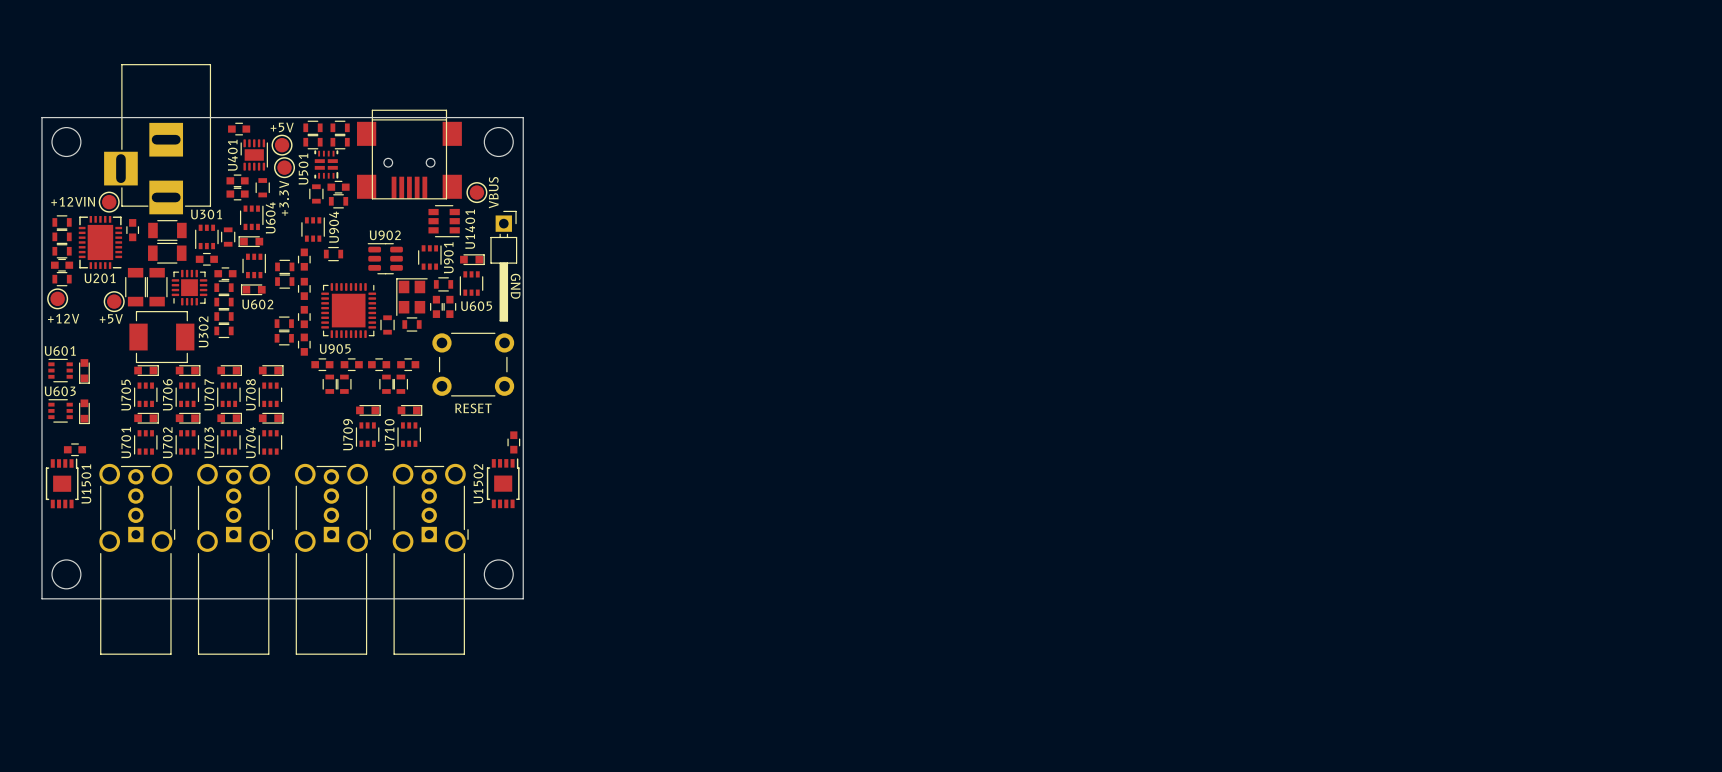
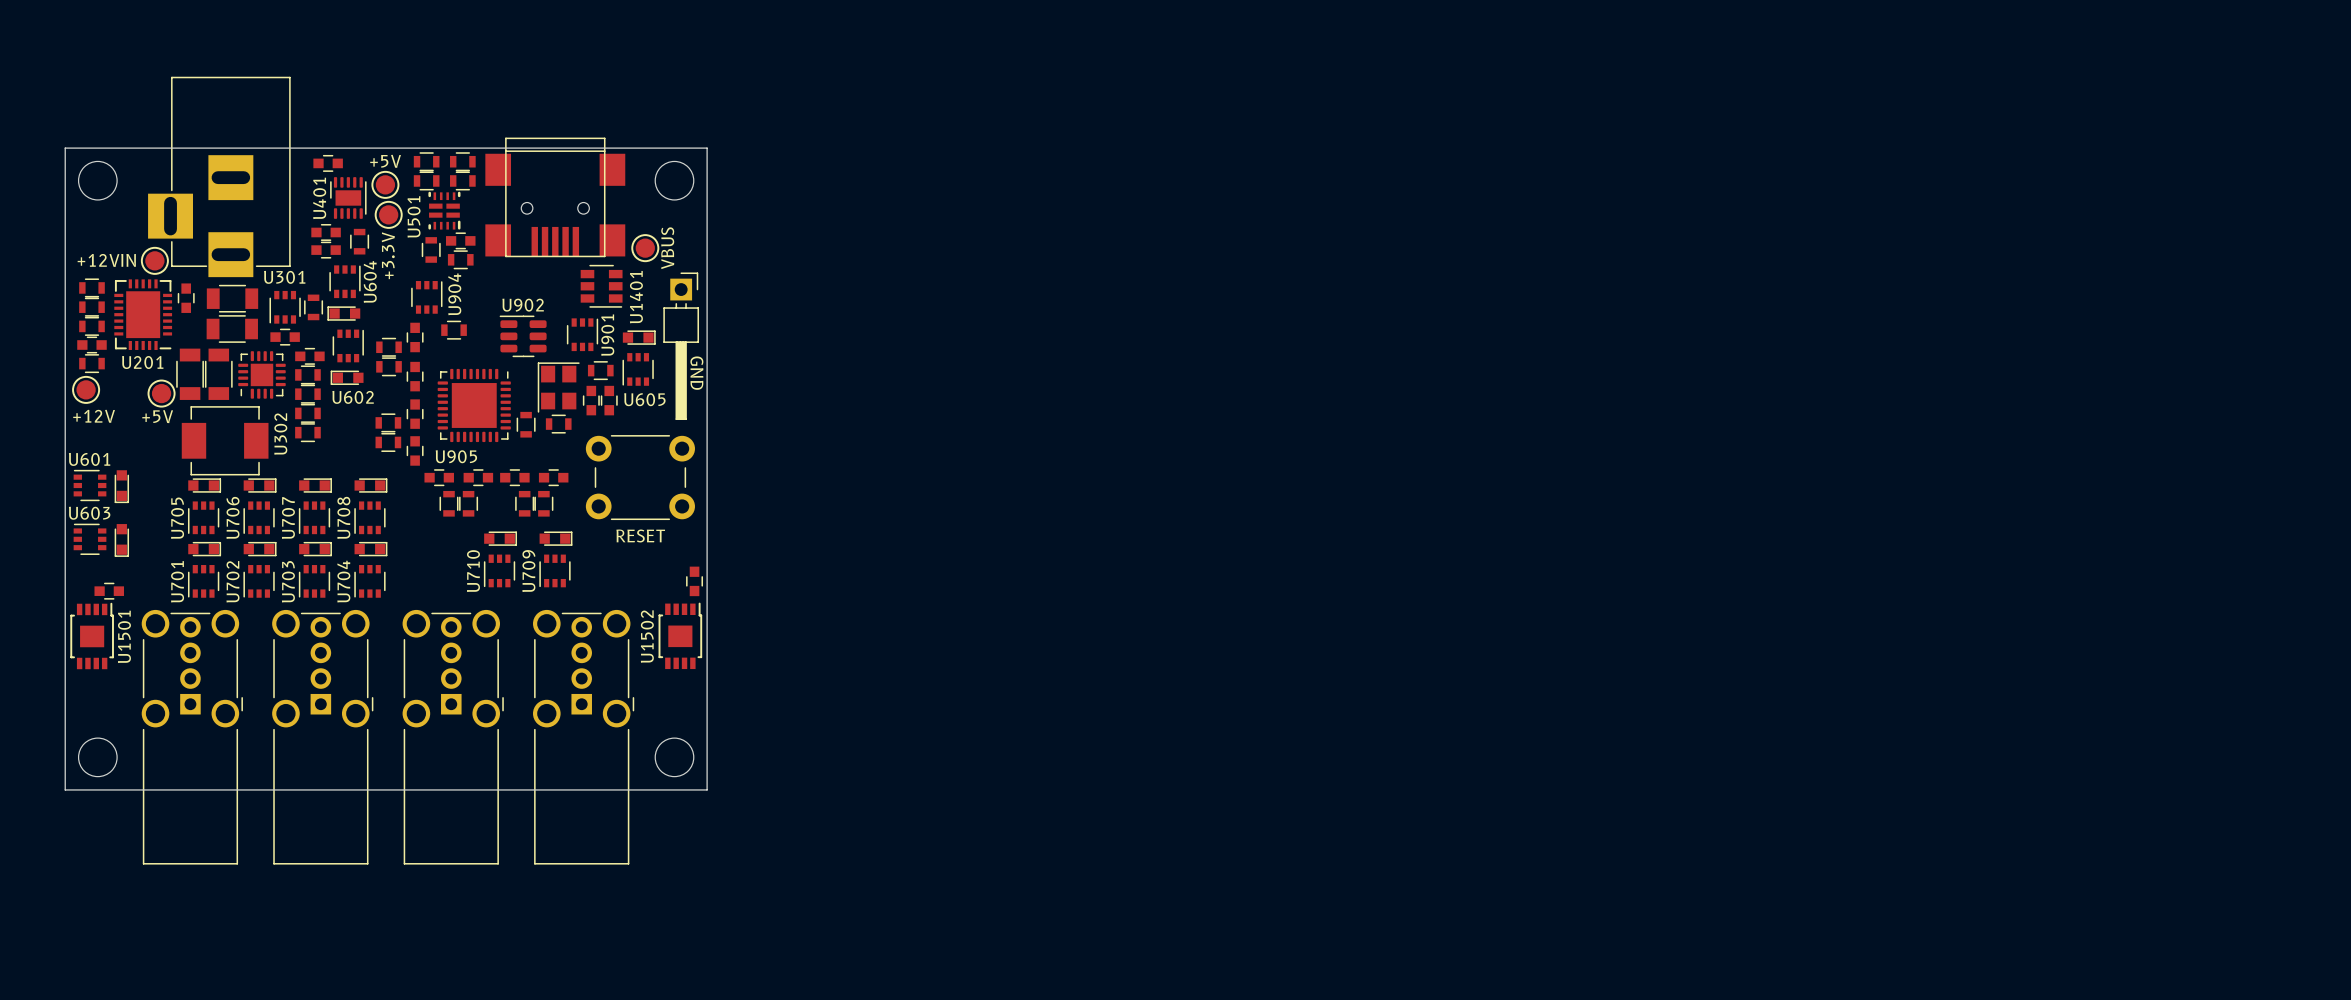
U709 name: U709 (348, 434) -> U710 (473, 571)
U710 name: U710 (389, 434) -> U709 (528, 571)

